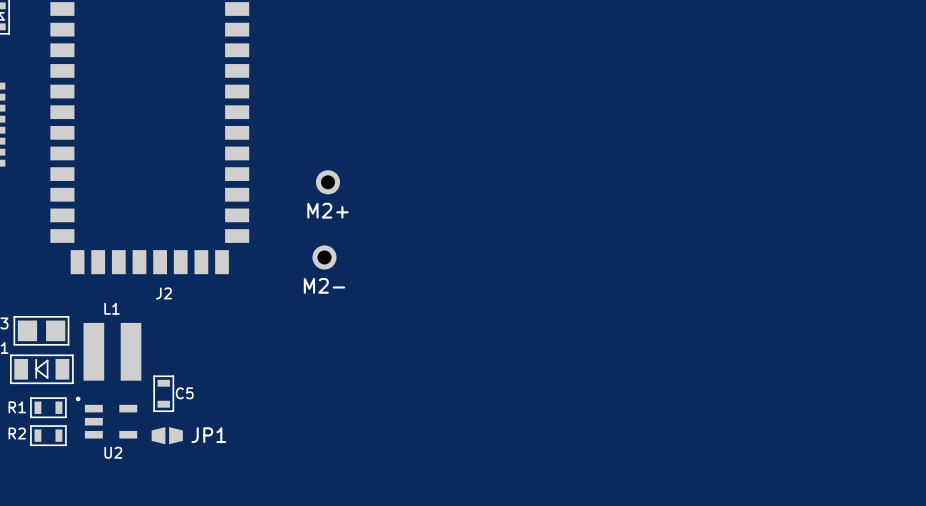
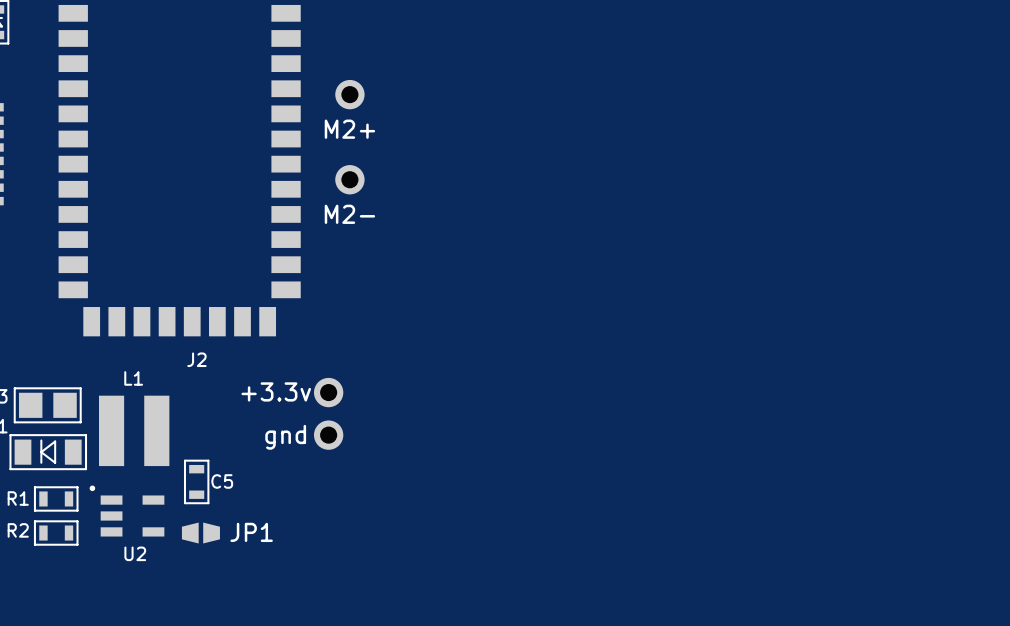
part position: (328, 182) -> (349, 94)
part position: (324, 257) -> (349, 179)
part: none -> +3.3v (328, 392)
part: none -> gnd (328, 435)

